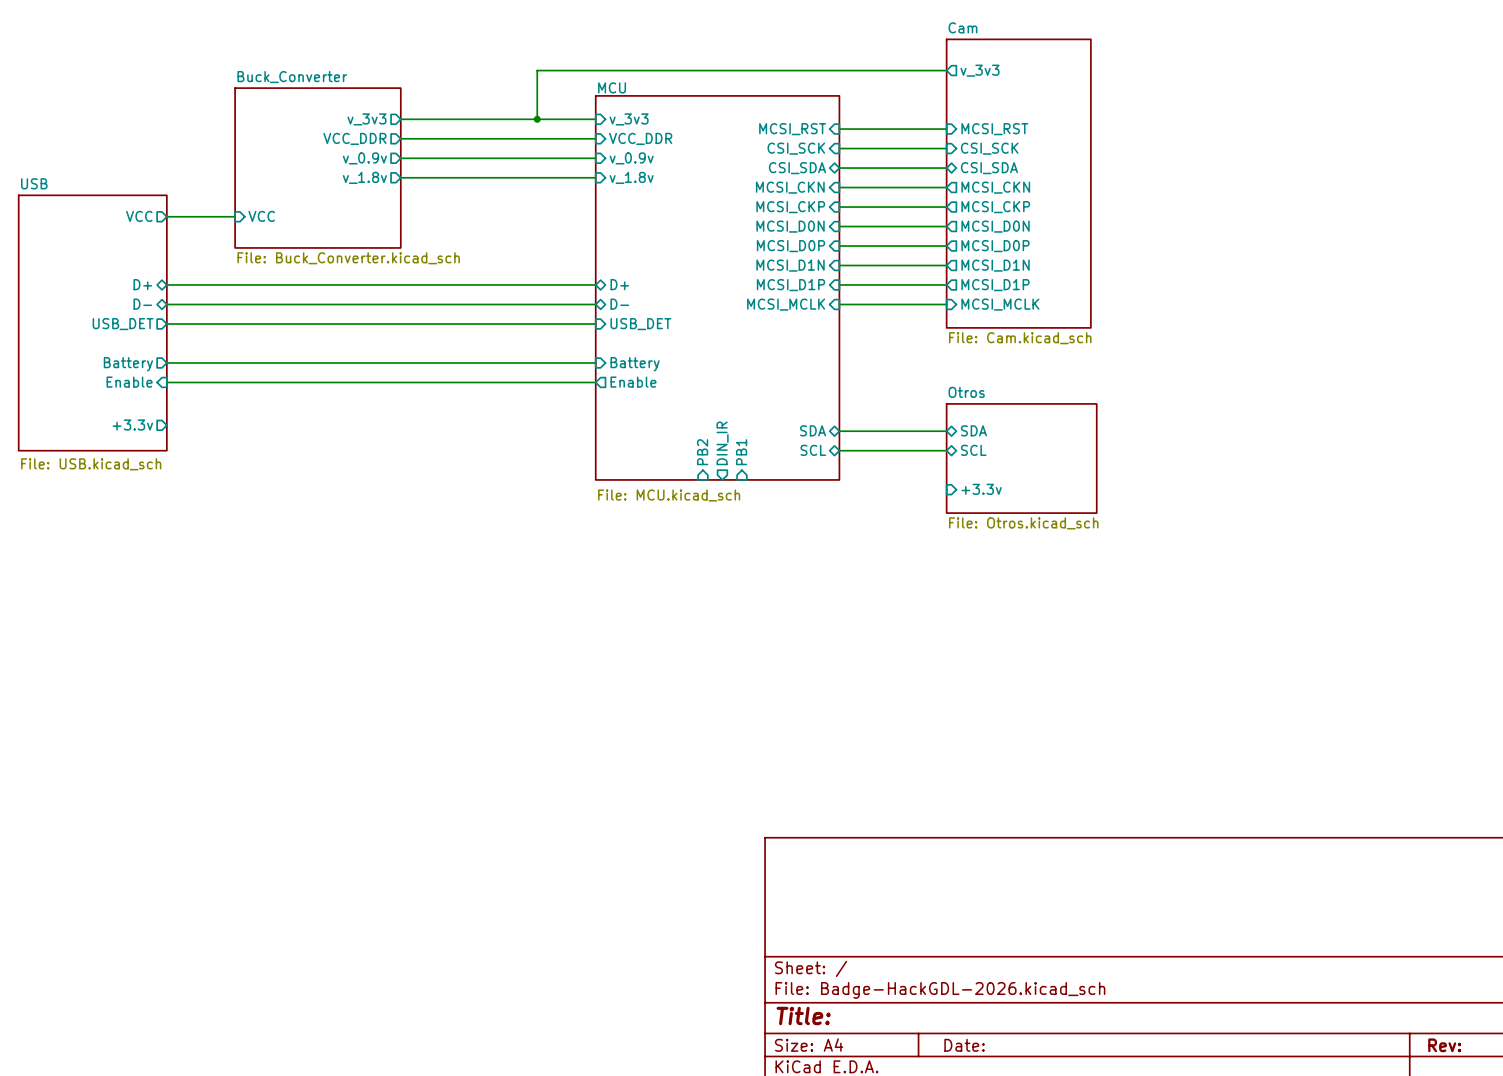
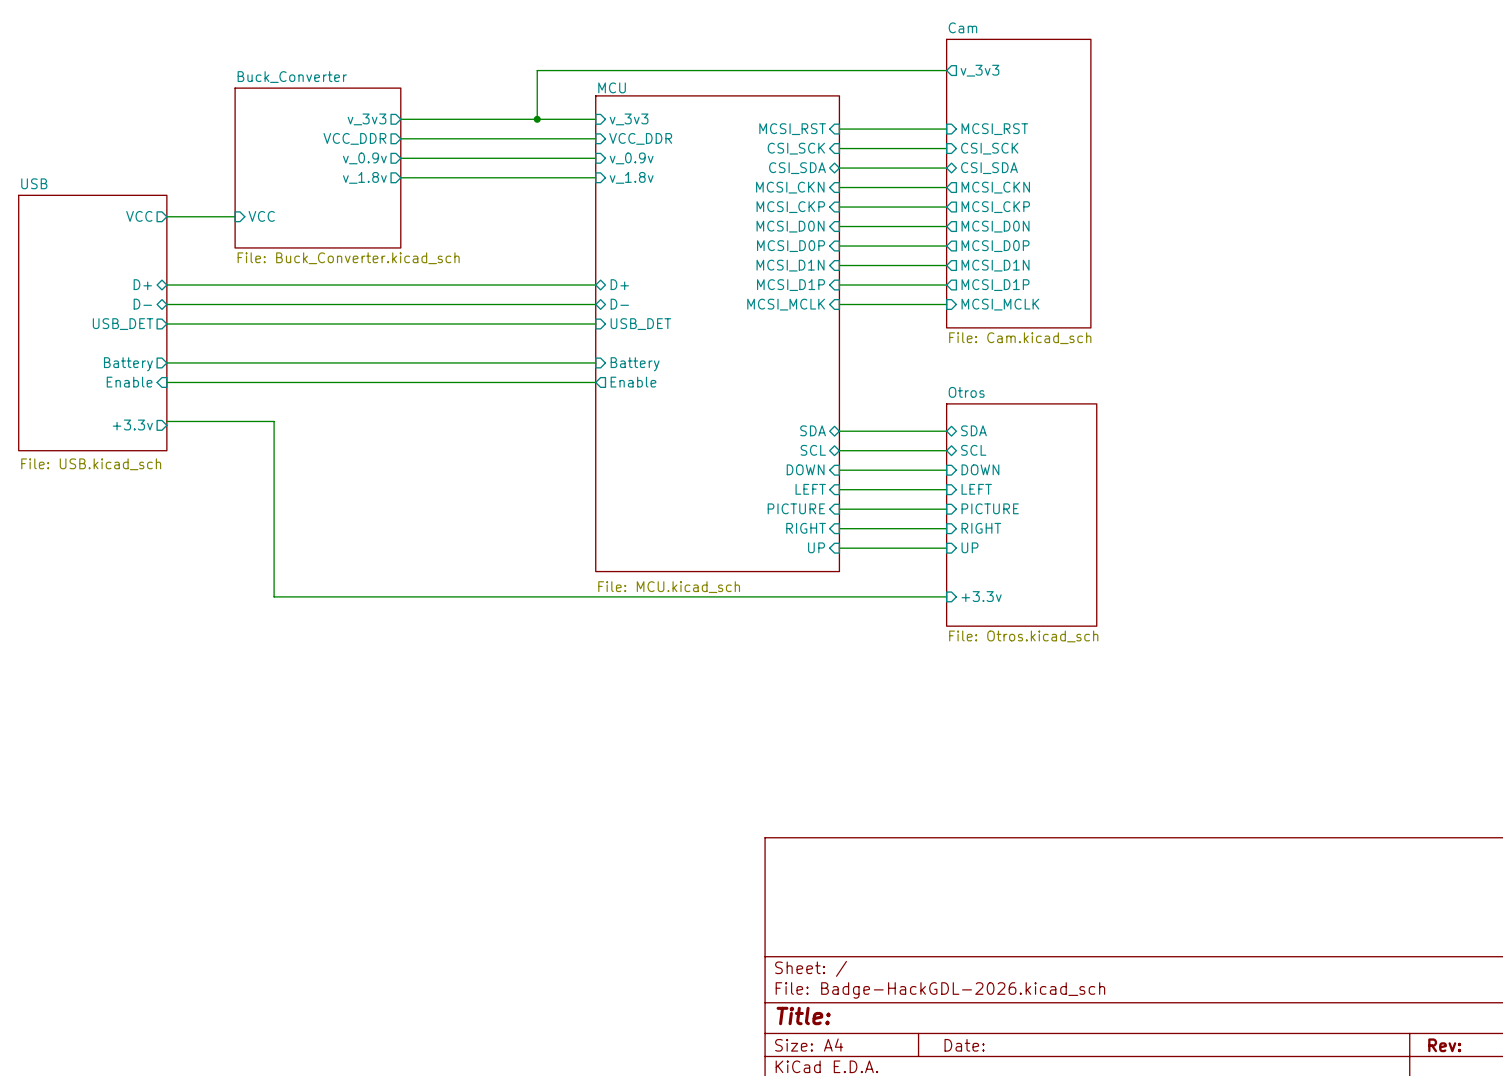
sheet MCU: File: MCU.kicad_sch (717, 287) -> none
sheet MCU: none -> File: MCU.kicad_sch (717, 333)
wire: none -> (166, 421) (274, 421) (274, 596) (946, 596)
sheet pin: DIN_IR (722, 443) -> none
sheet pin: PB2 (702, 452) -> none
sheet pin: PB1 (741, 452) -> none
sheet Otros: File: Otros.kicad_sch (1021, 458) -> none
sheet pin: none -> DOWN (805, 469)
sheet pin: none -> DOWN (980, 469)
wire: none -> (839, 470) (946, 470)
sheet pin: none -> LEFT (810, 489)
wire: none -> (839, 489) (946, 489)
sheet pin: +3.3v (981, 489) -> LEFT (976, 489)
sheet pin: none -> PICTURE (796, 508)
sheet pin: none -> PICTURE (990, 508)
wire: none -> (839, 509) (946, 509)
sheet Otros: none -> File: Otros.kicad_sch (1021, 515)
sheet pin: none -> RIGHT (806, 528)
wire: none -> (839, 528) (946, 528)
sheet pin: none -> RIGHT (981, 528)
sheet pin: none -> UP (816, 547)
sheet pin: none -> UP (969, 547)
wire: none -> (839, 548) (946, 548)
sheet pin: none -> +3.3v (981, 596)

